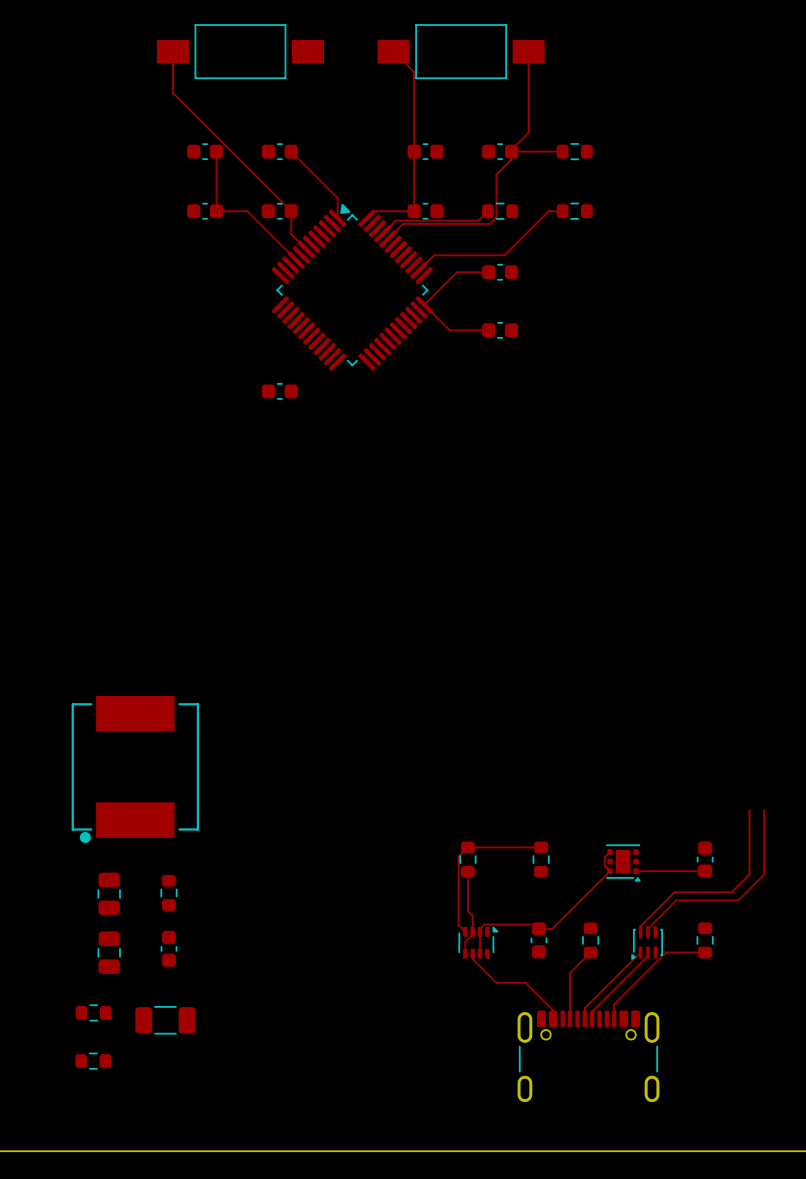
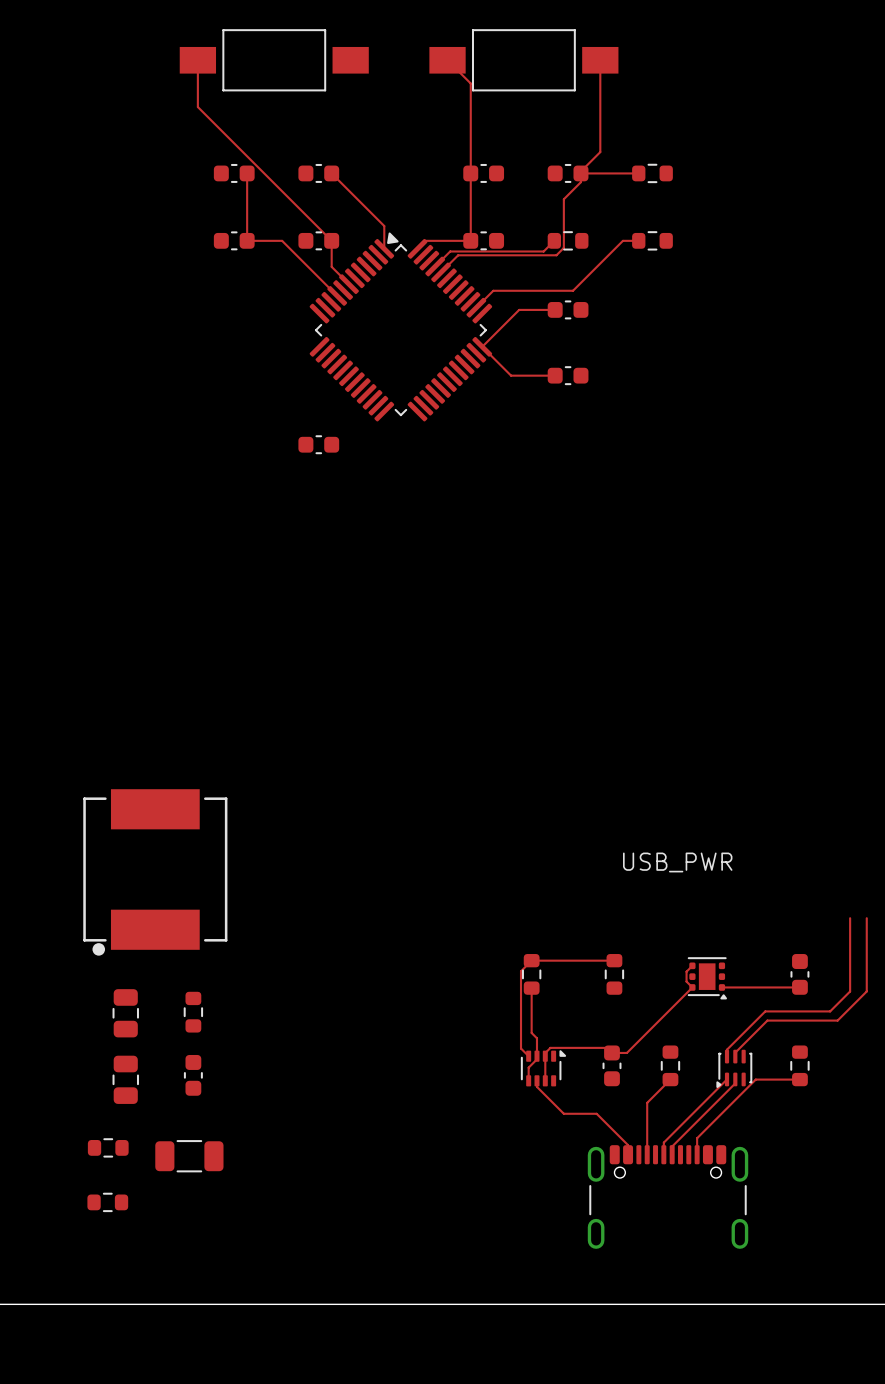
text: none -> USB_PWR (677, 862)

